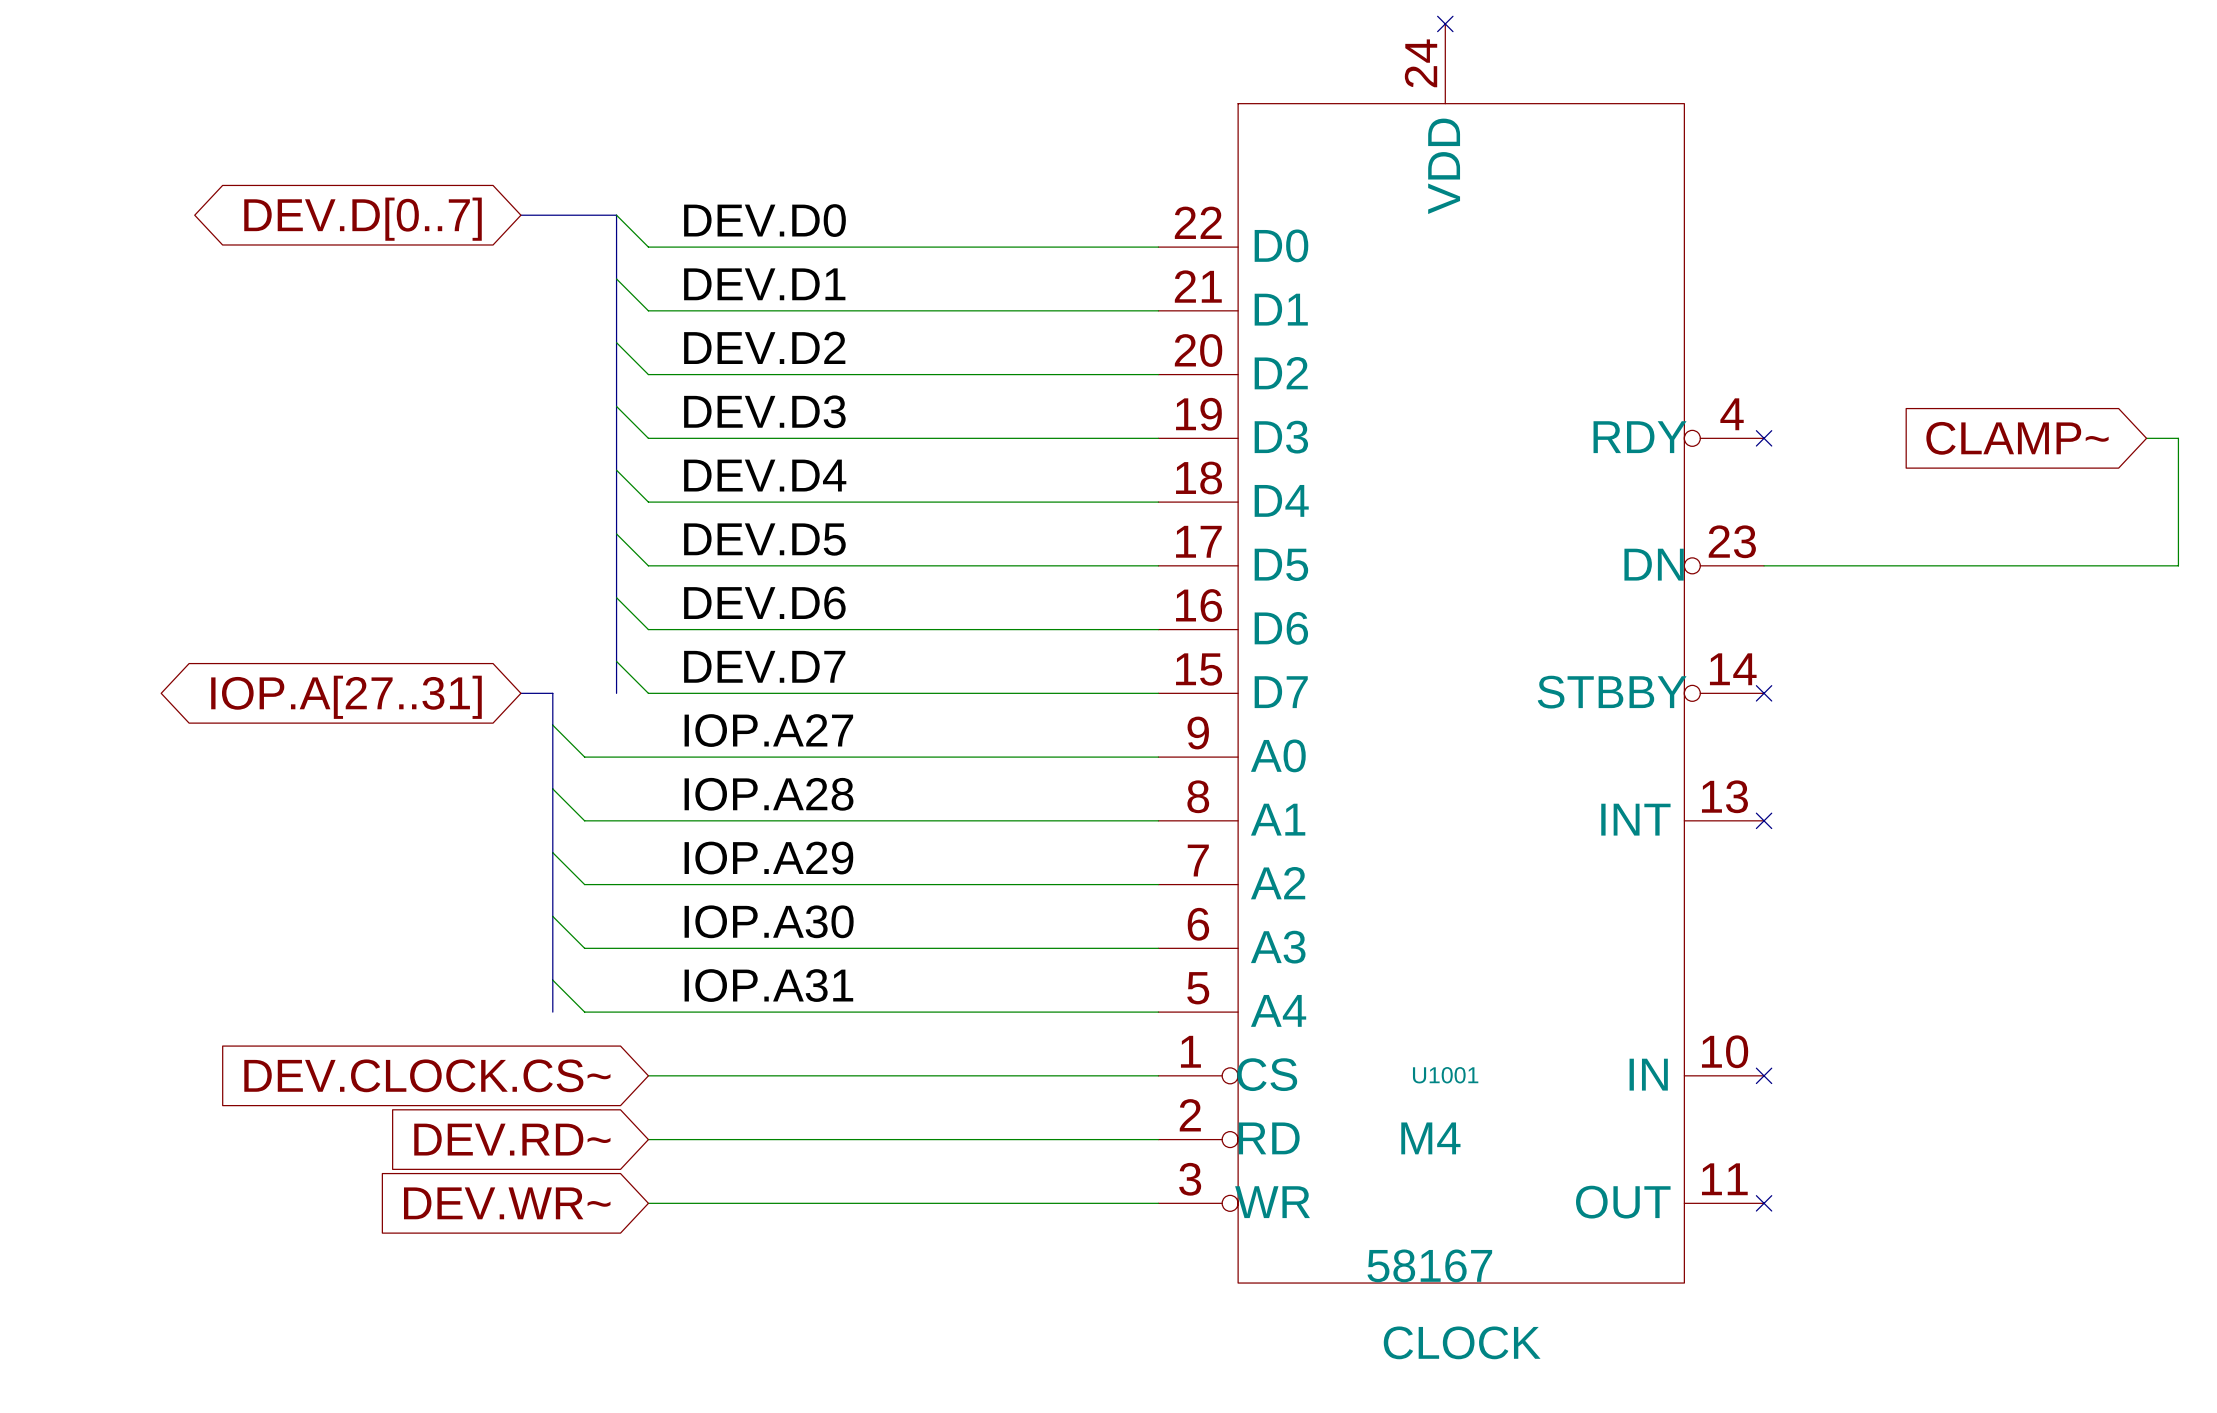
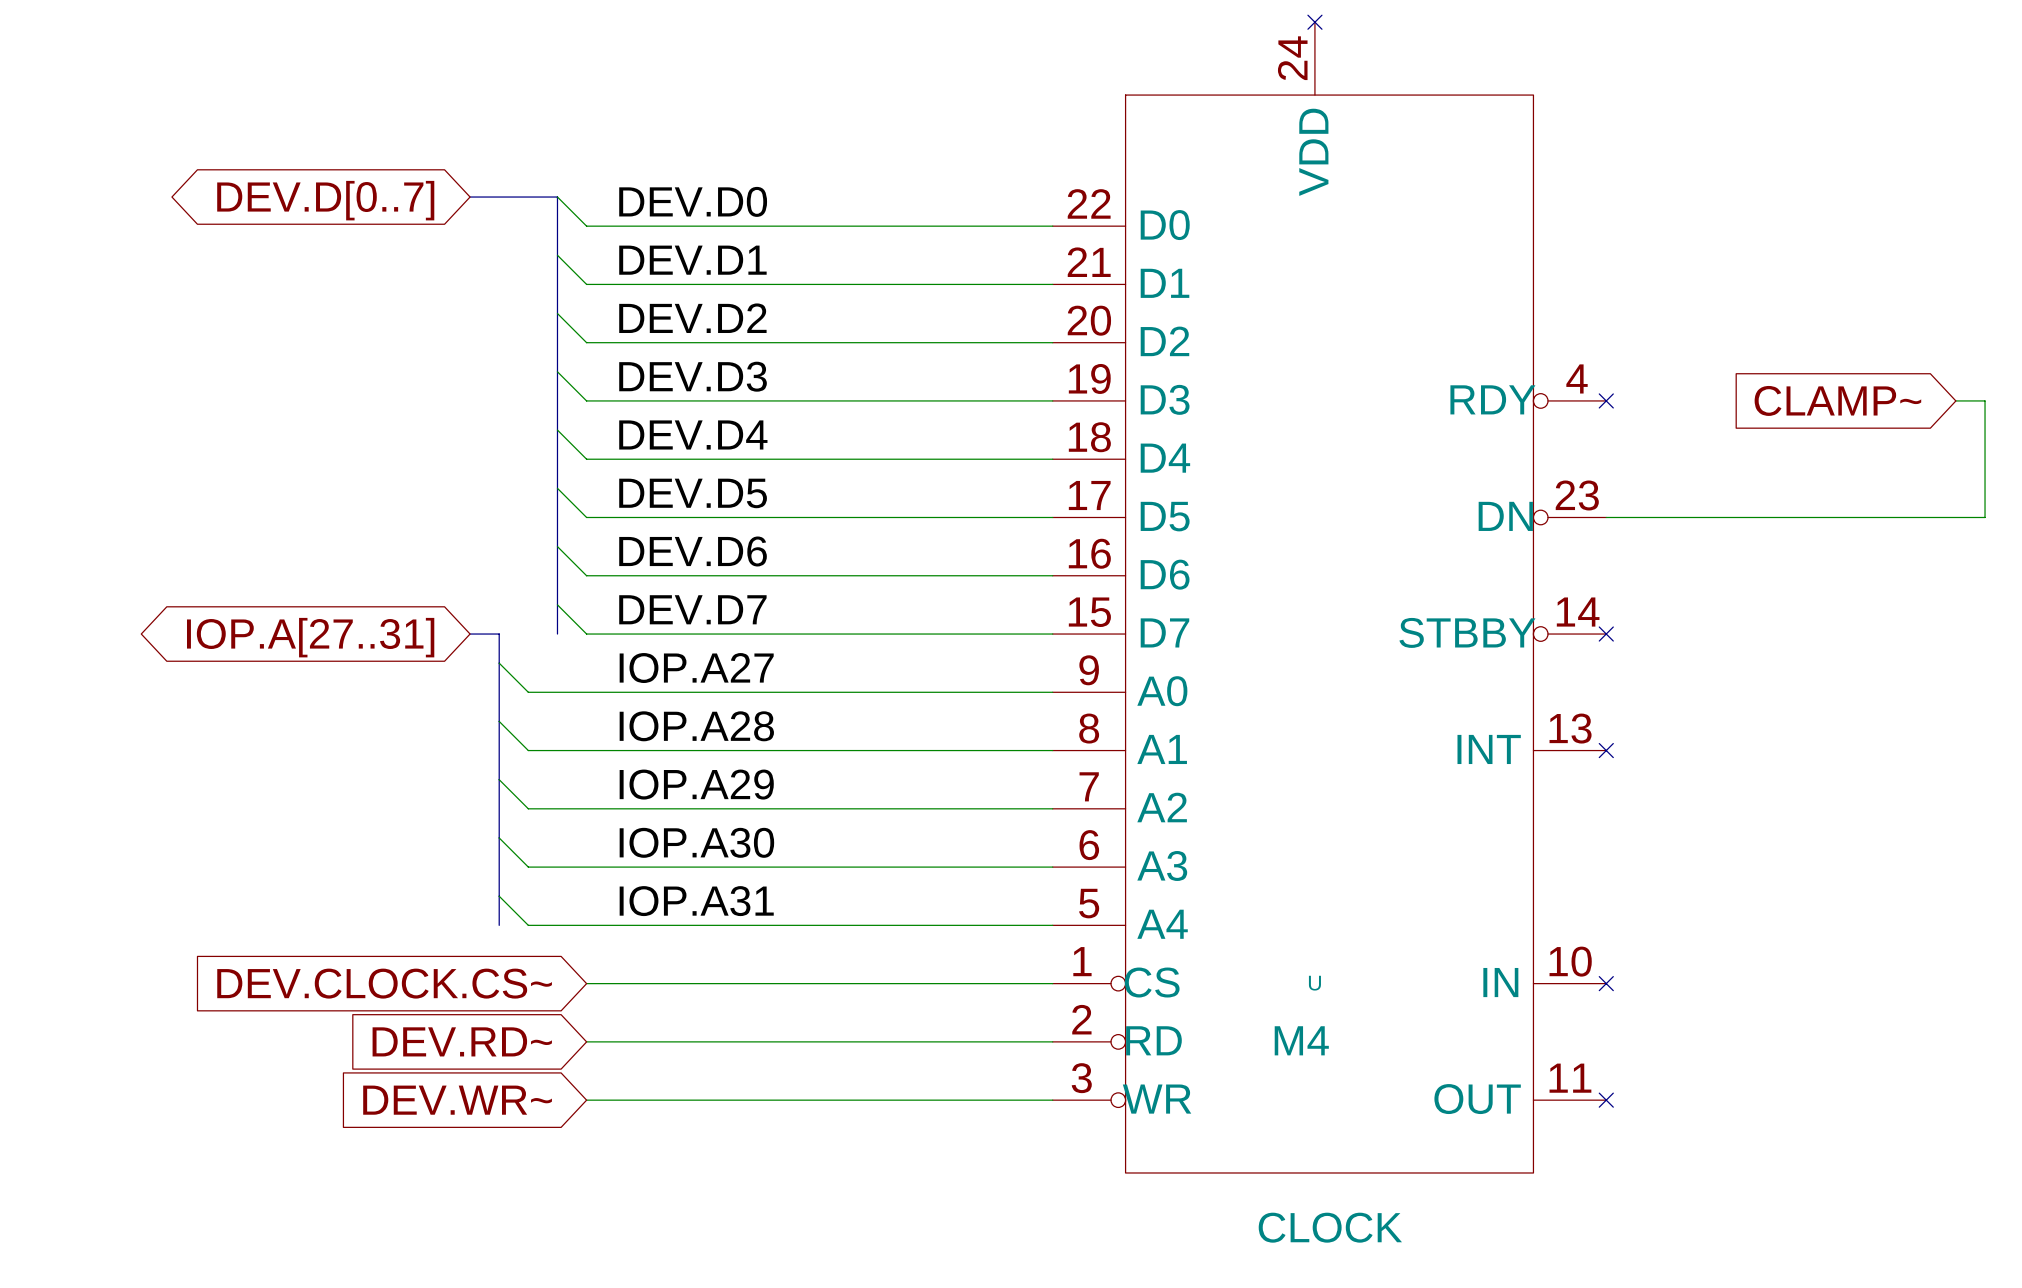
U1001 name: U1001 (1445, 1075) -> U (1314, 983)
U1001 value: 58167 (1429, 1265) -> none

